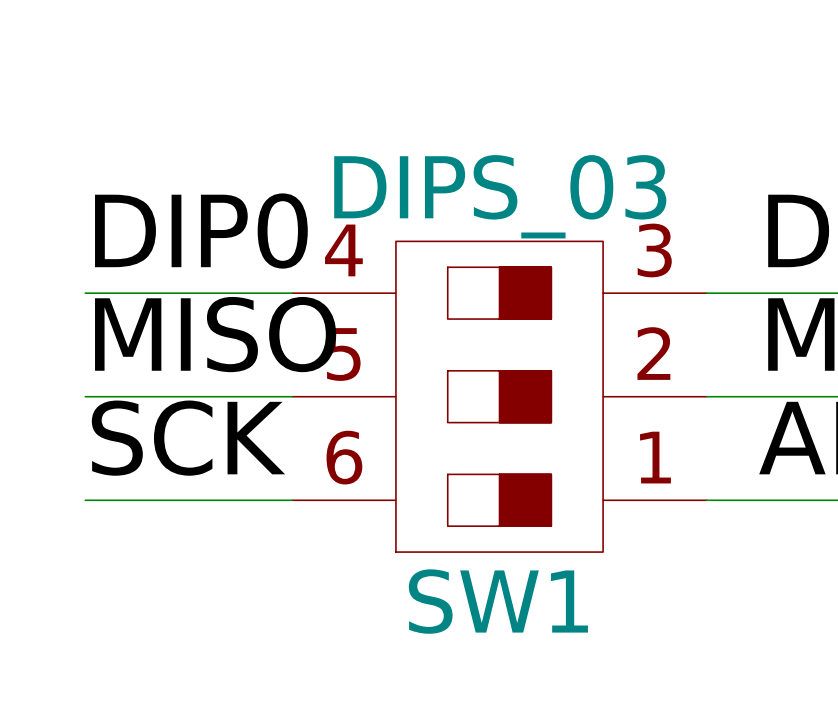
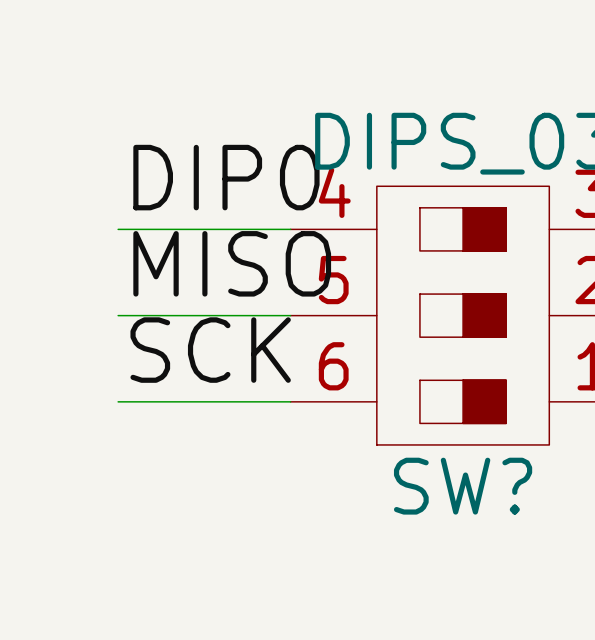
SW1 name: SW1 (498, 601) -> SW? (463, 486)

